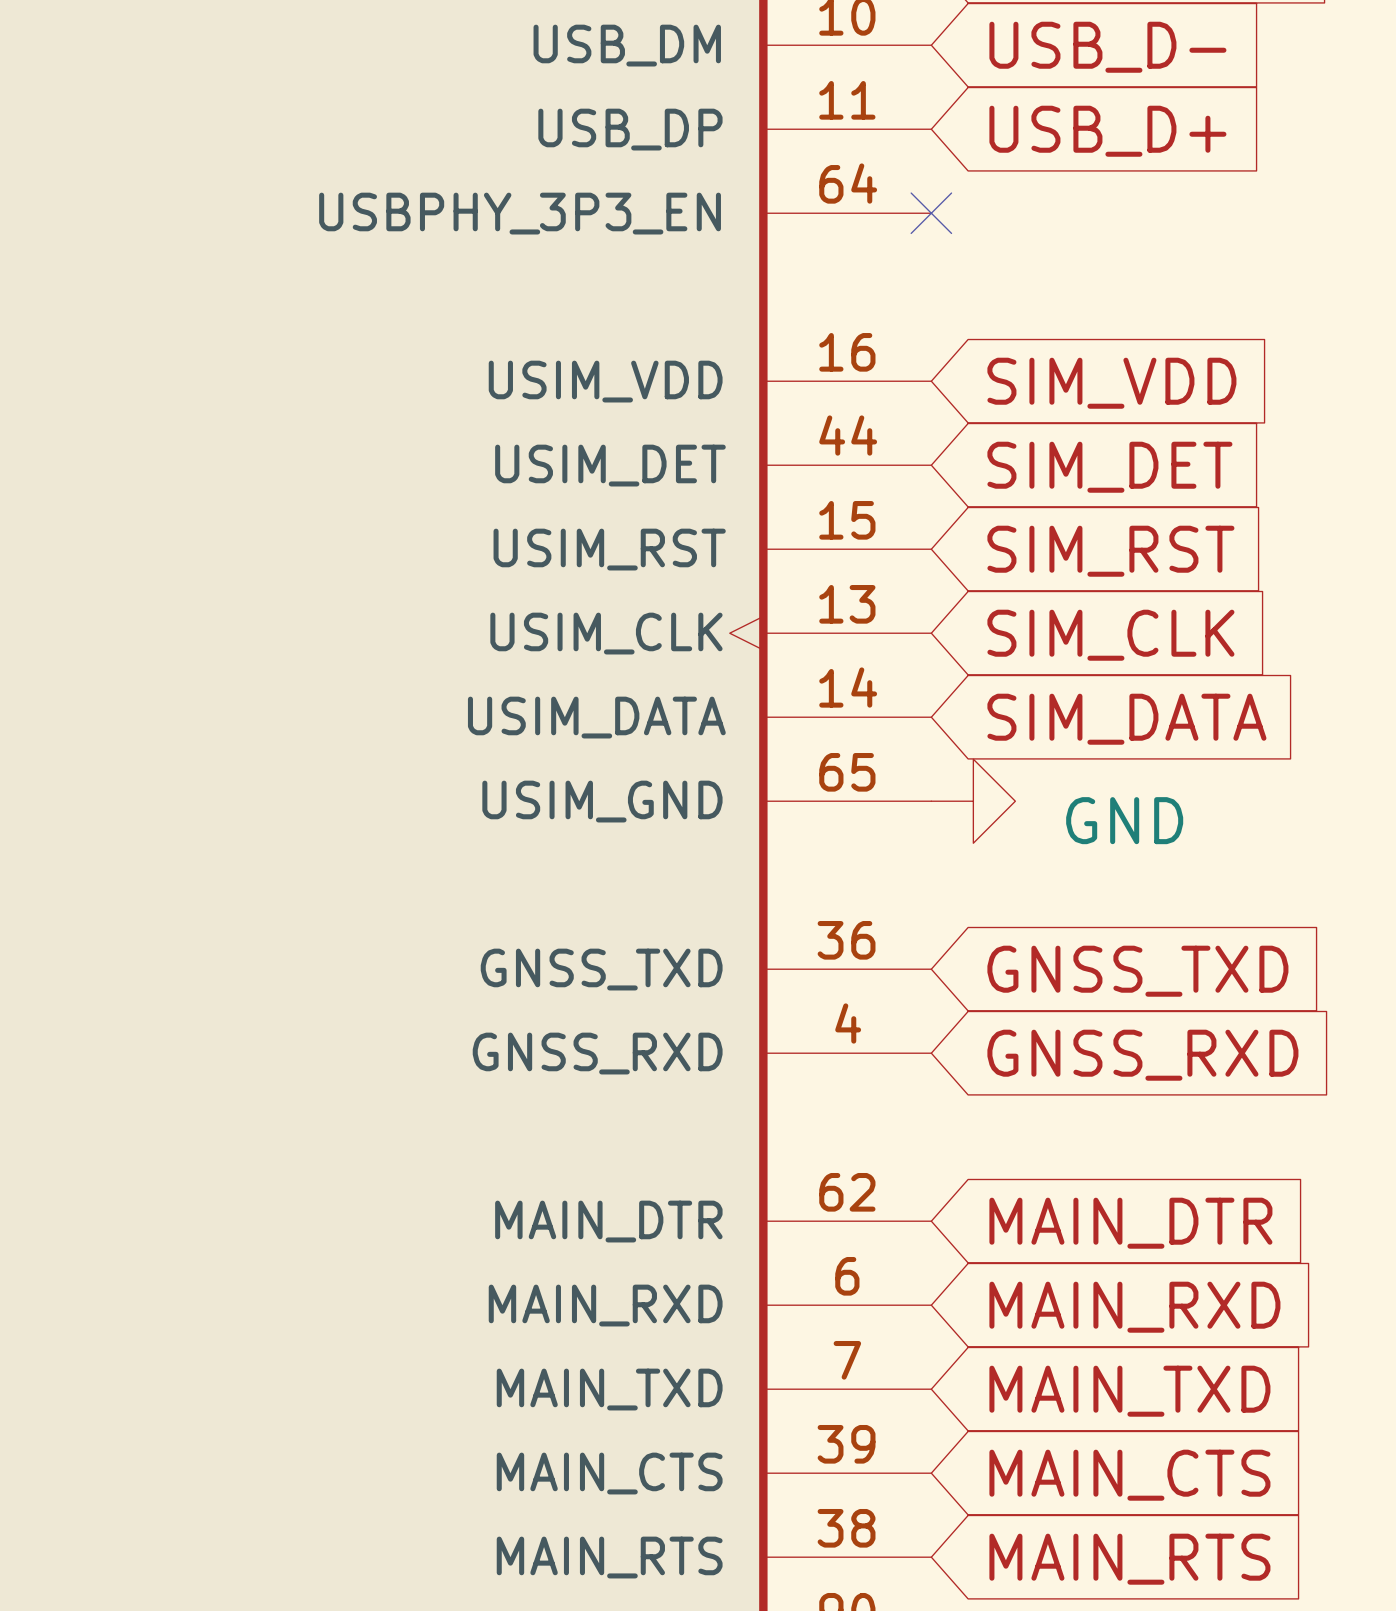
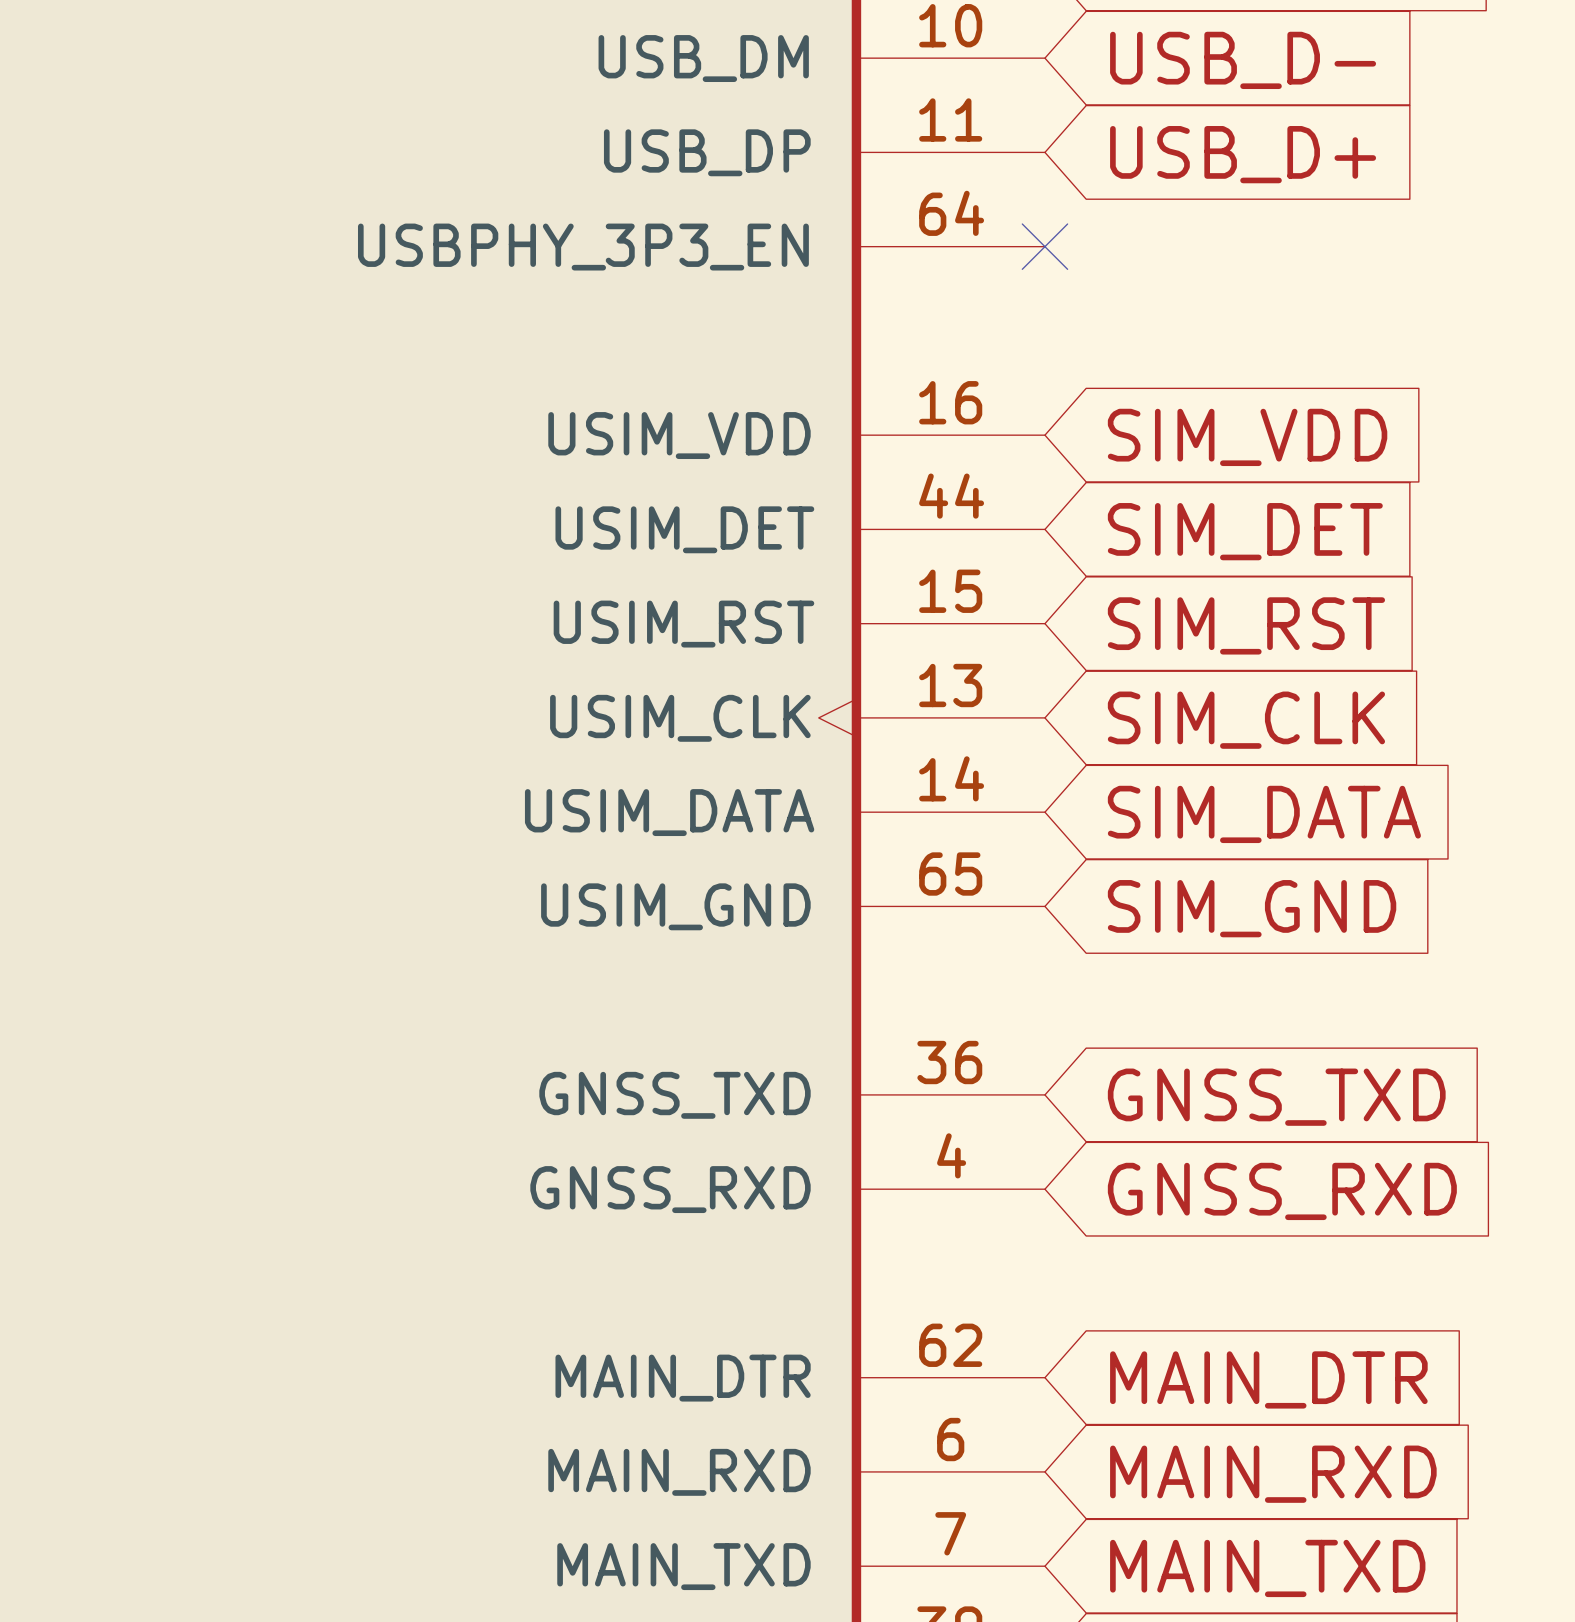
power symbol: GND (973, 801) -> none
global label: none -> SIM_GND (1252, 908)

